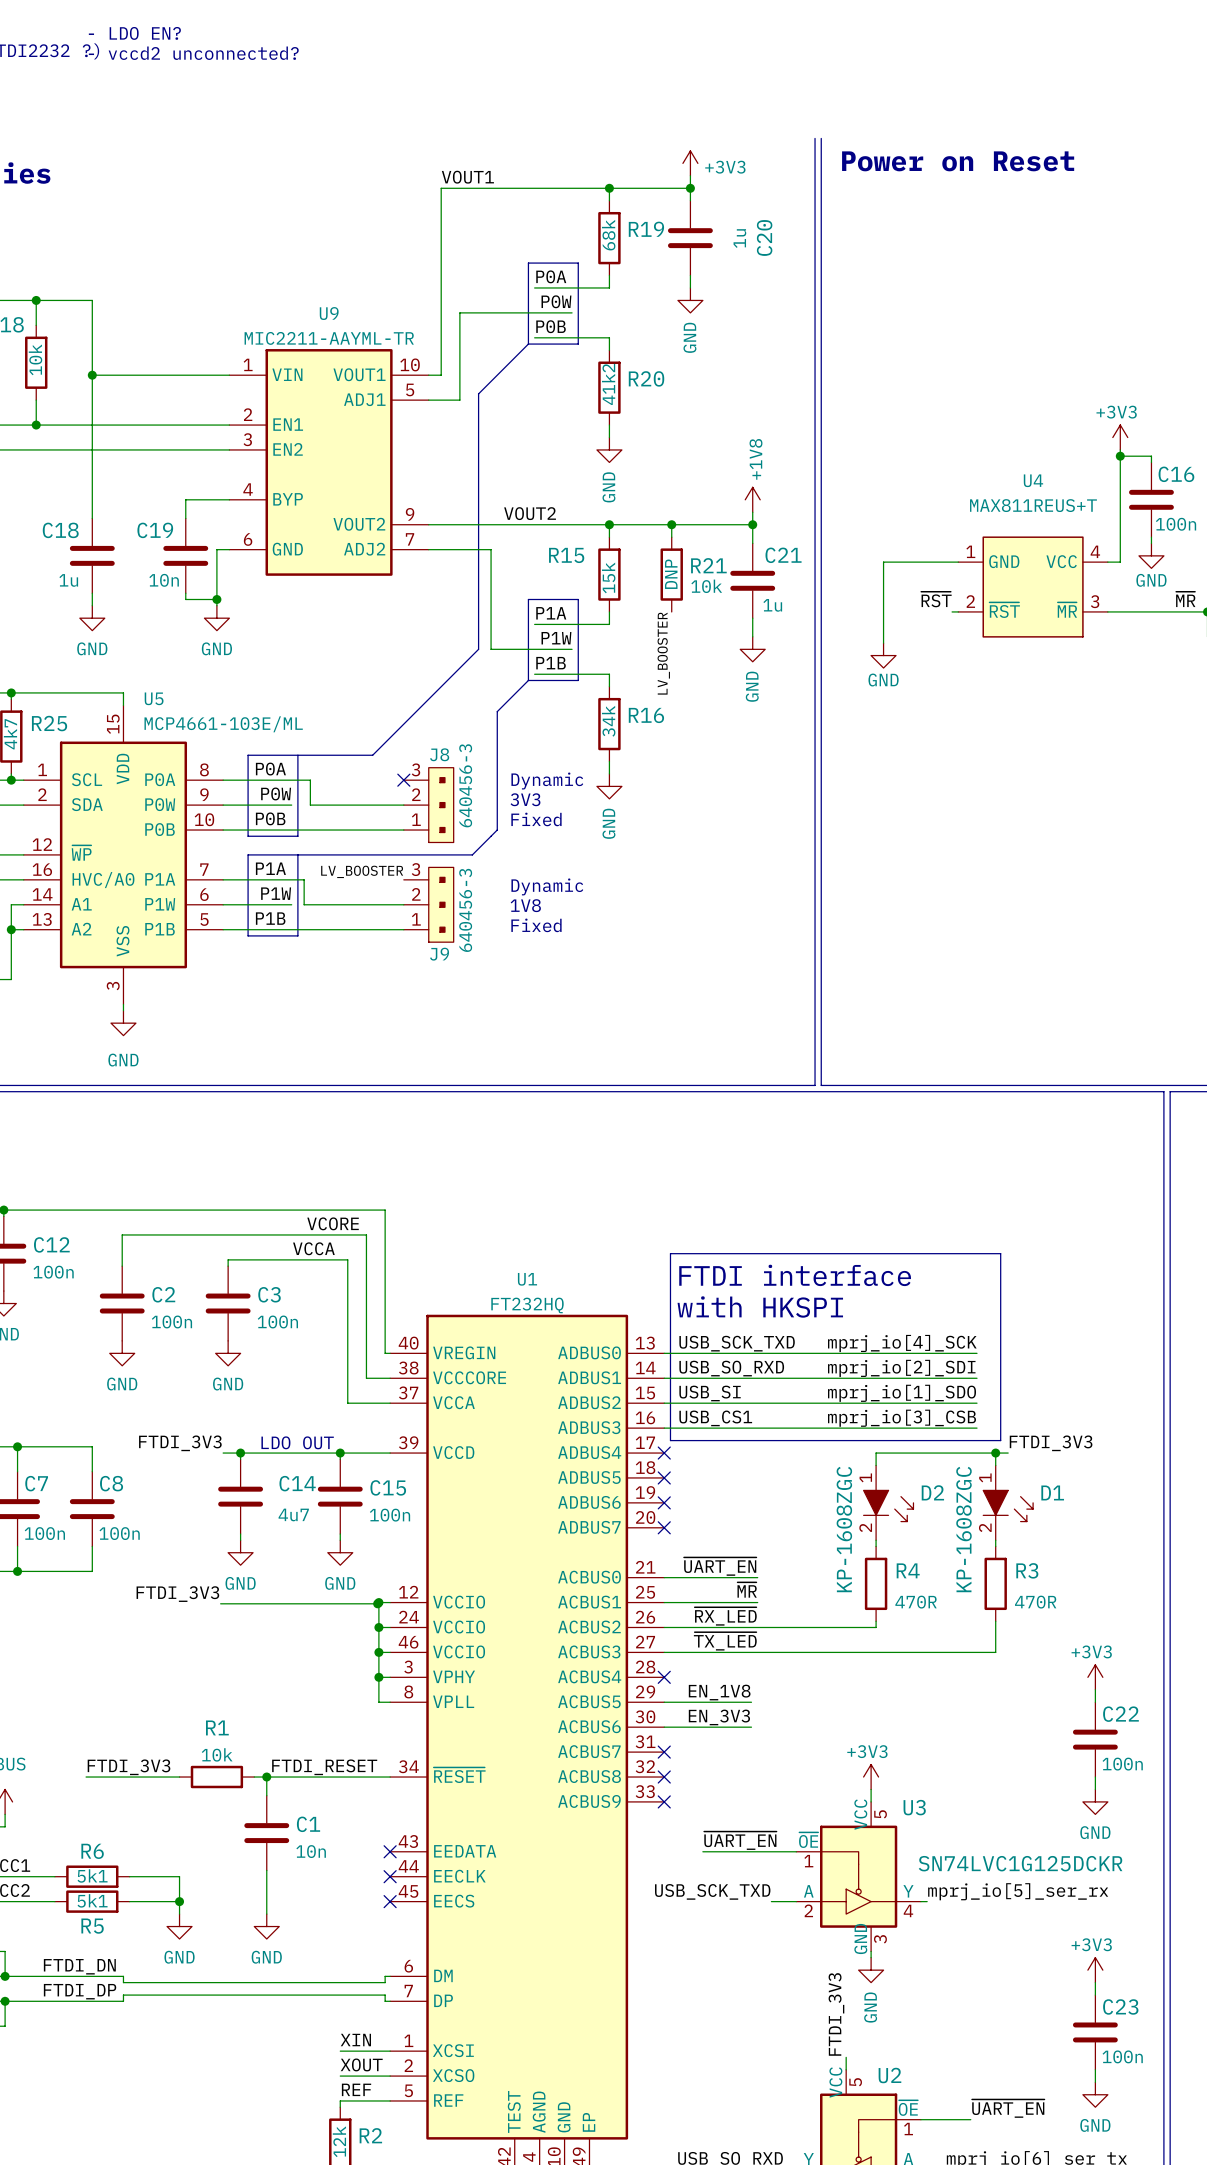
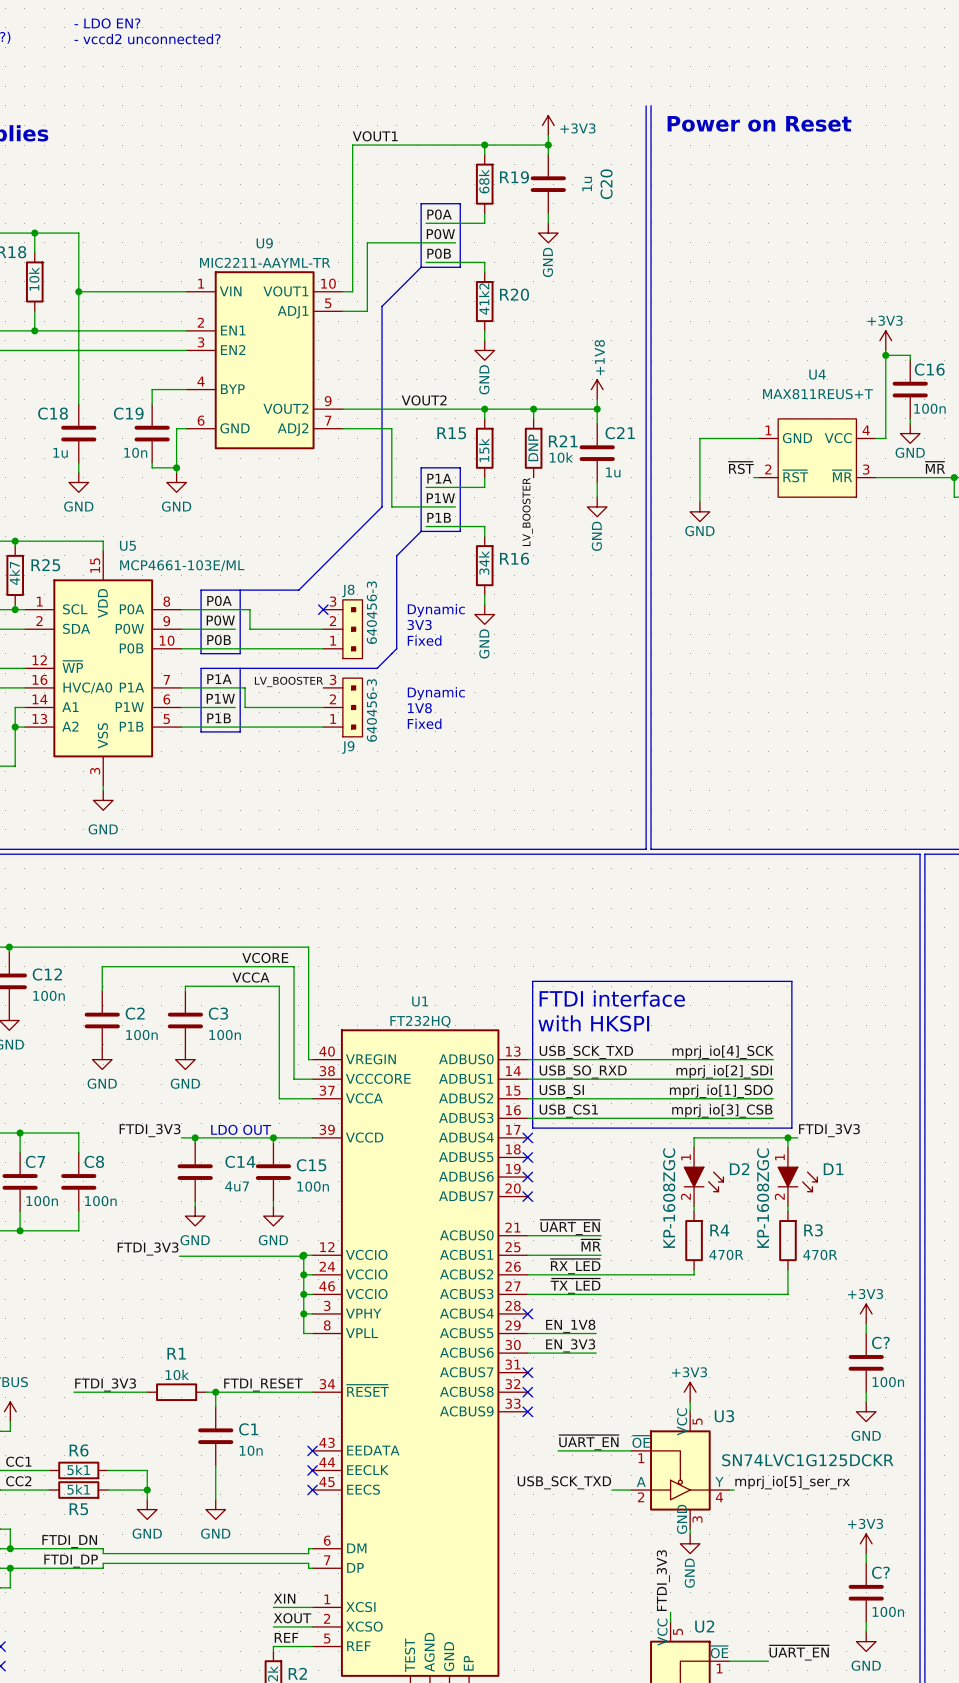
C22 name: C22 (1120, 1714) -> C? (880, 1342)
C23 name: C23 (1120, 2006) -> C? (880, 1572)

